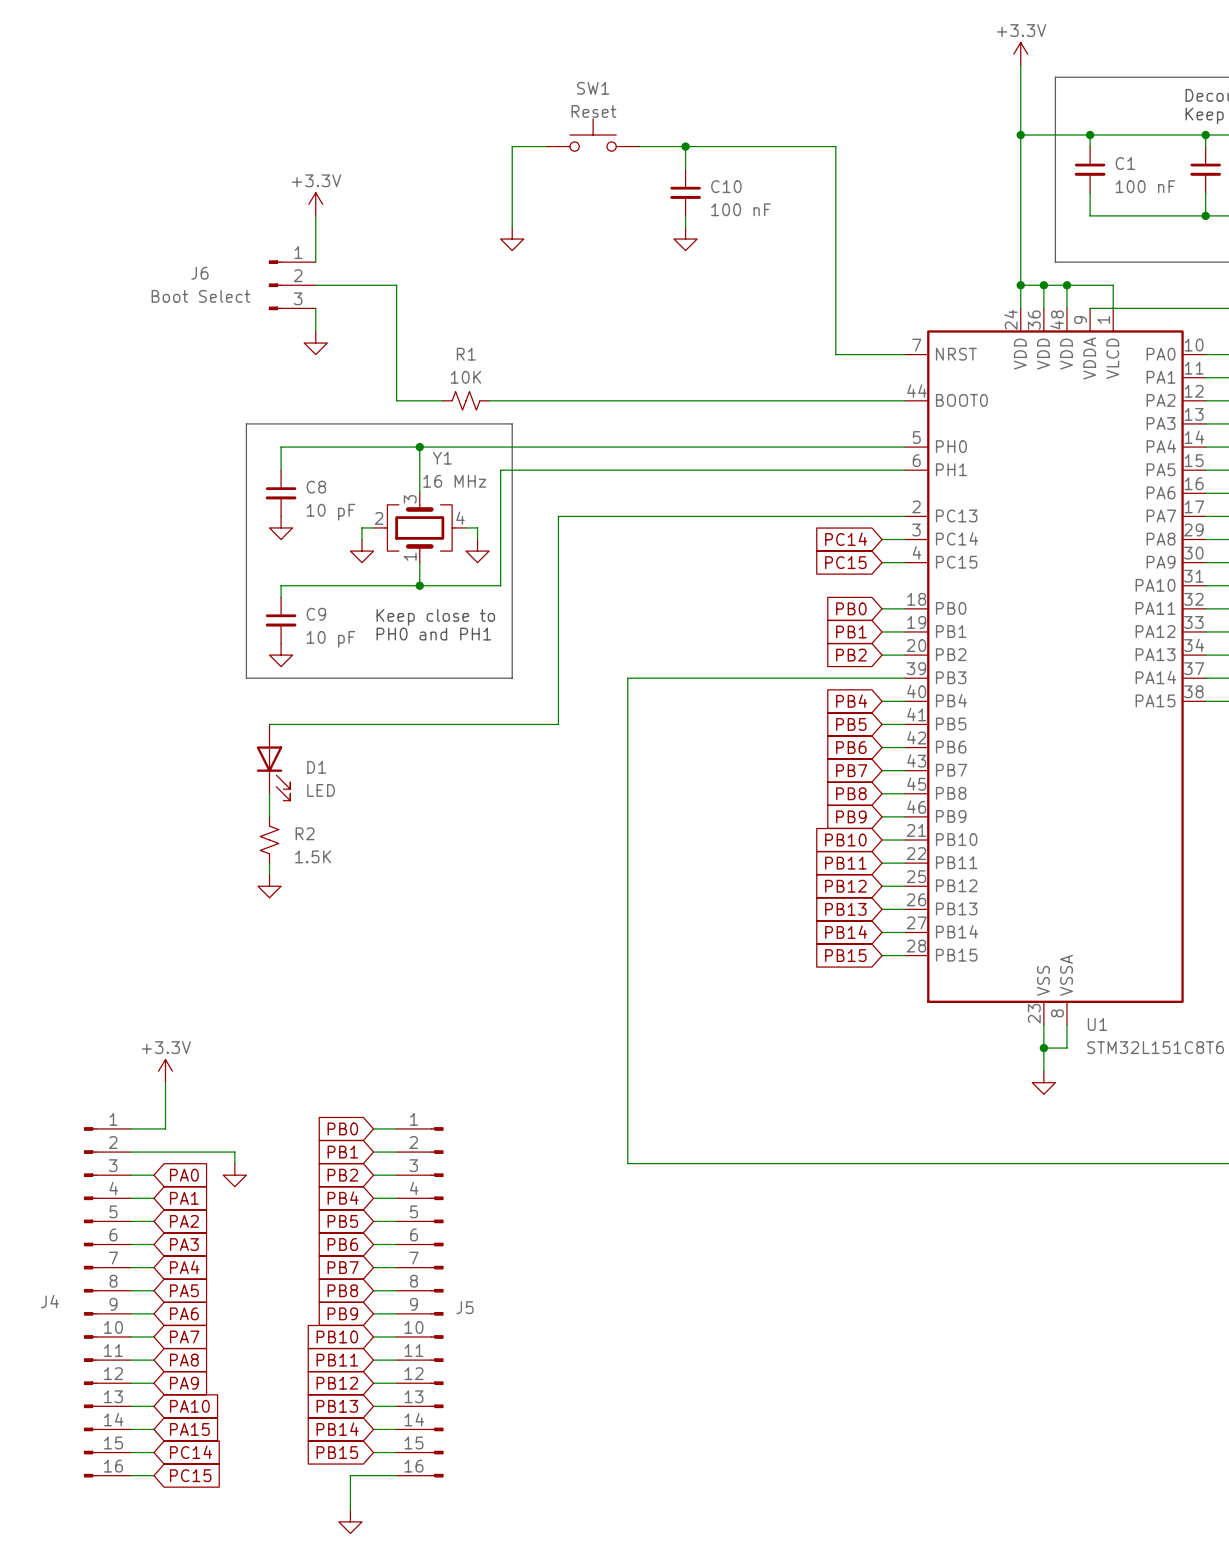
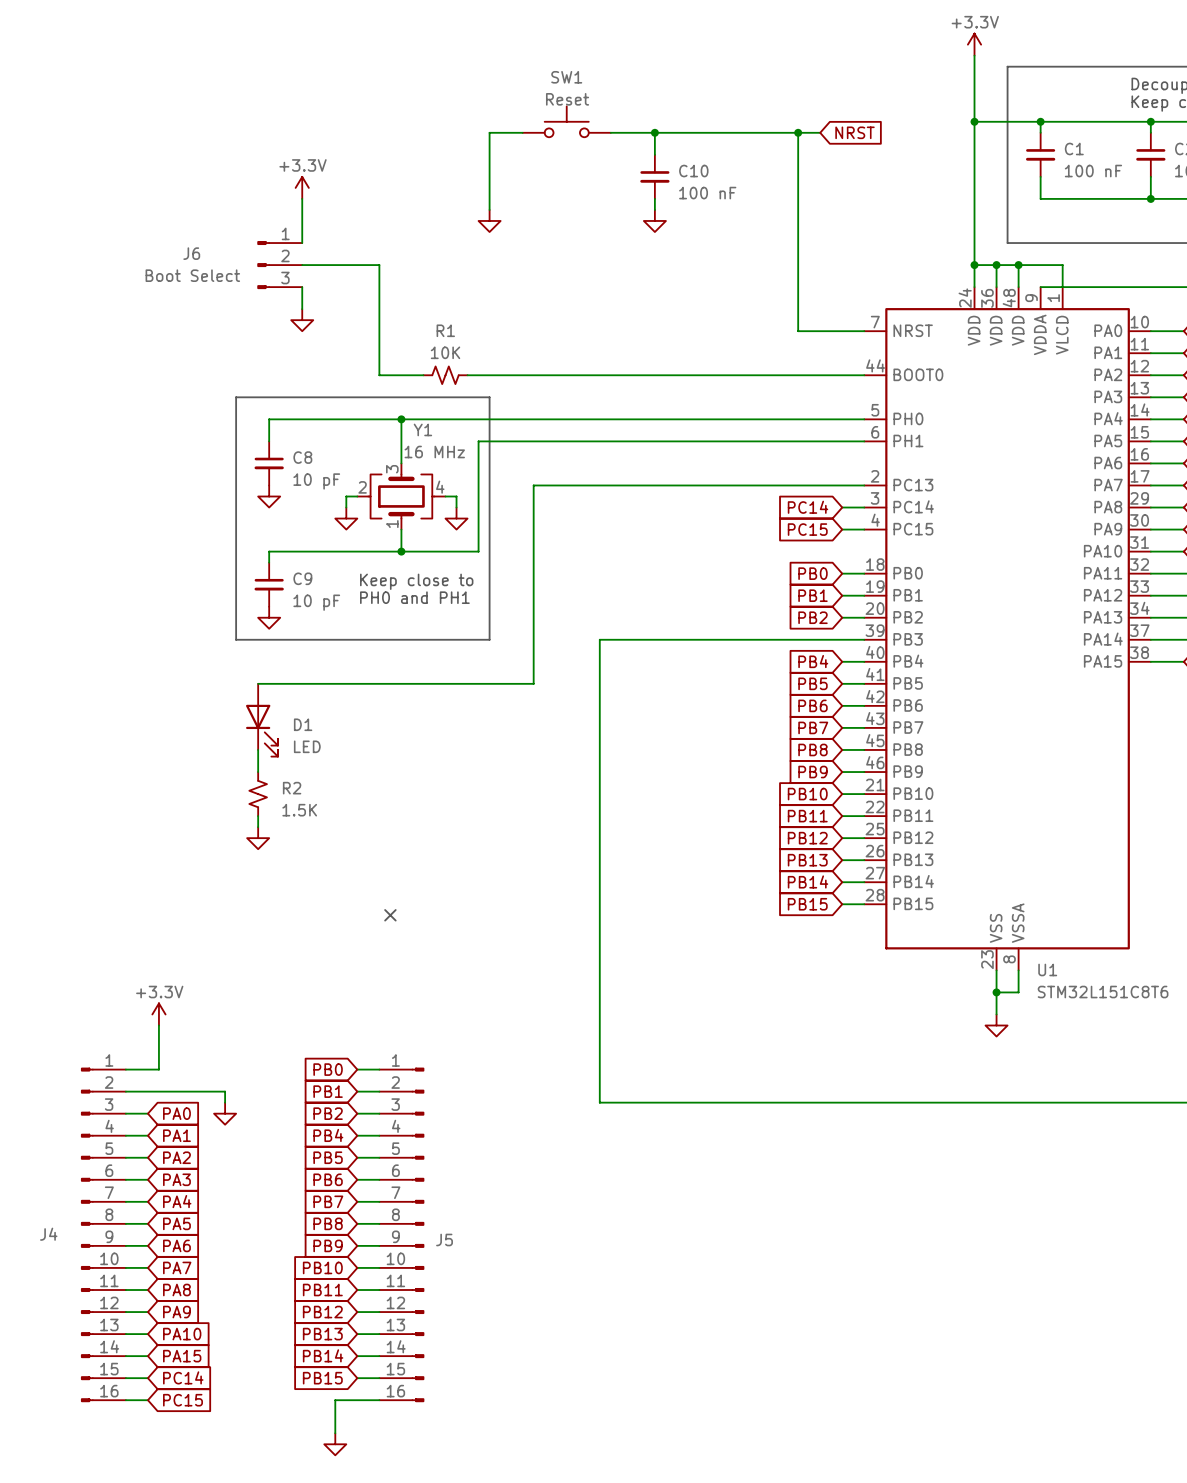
wire: none -> (798, 132) (820, 132)
junction: none -> (798, 132)
global label: none -> NRST (855, 132)
no-connect mark: none -> (390, 915)

